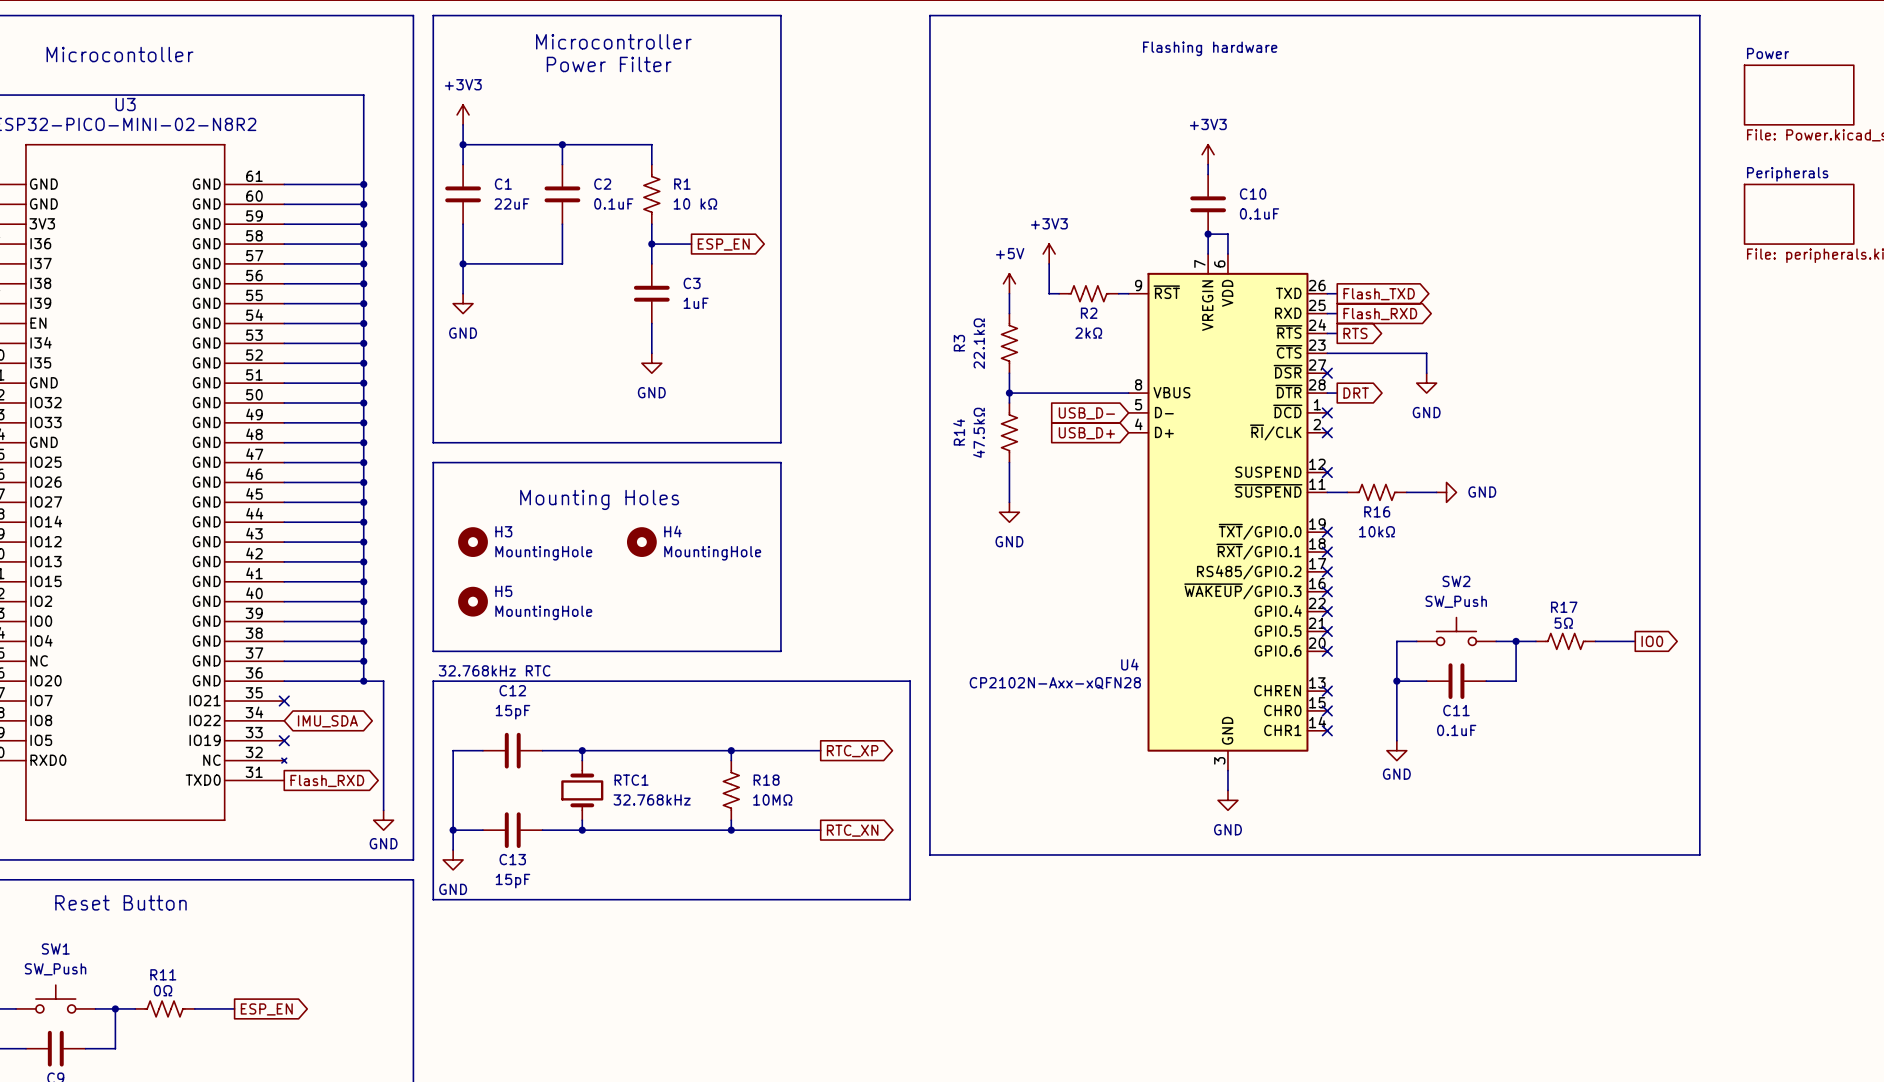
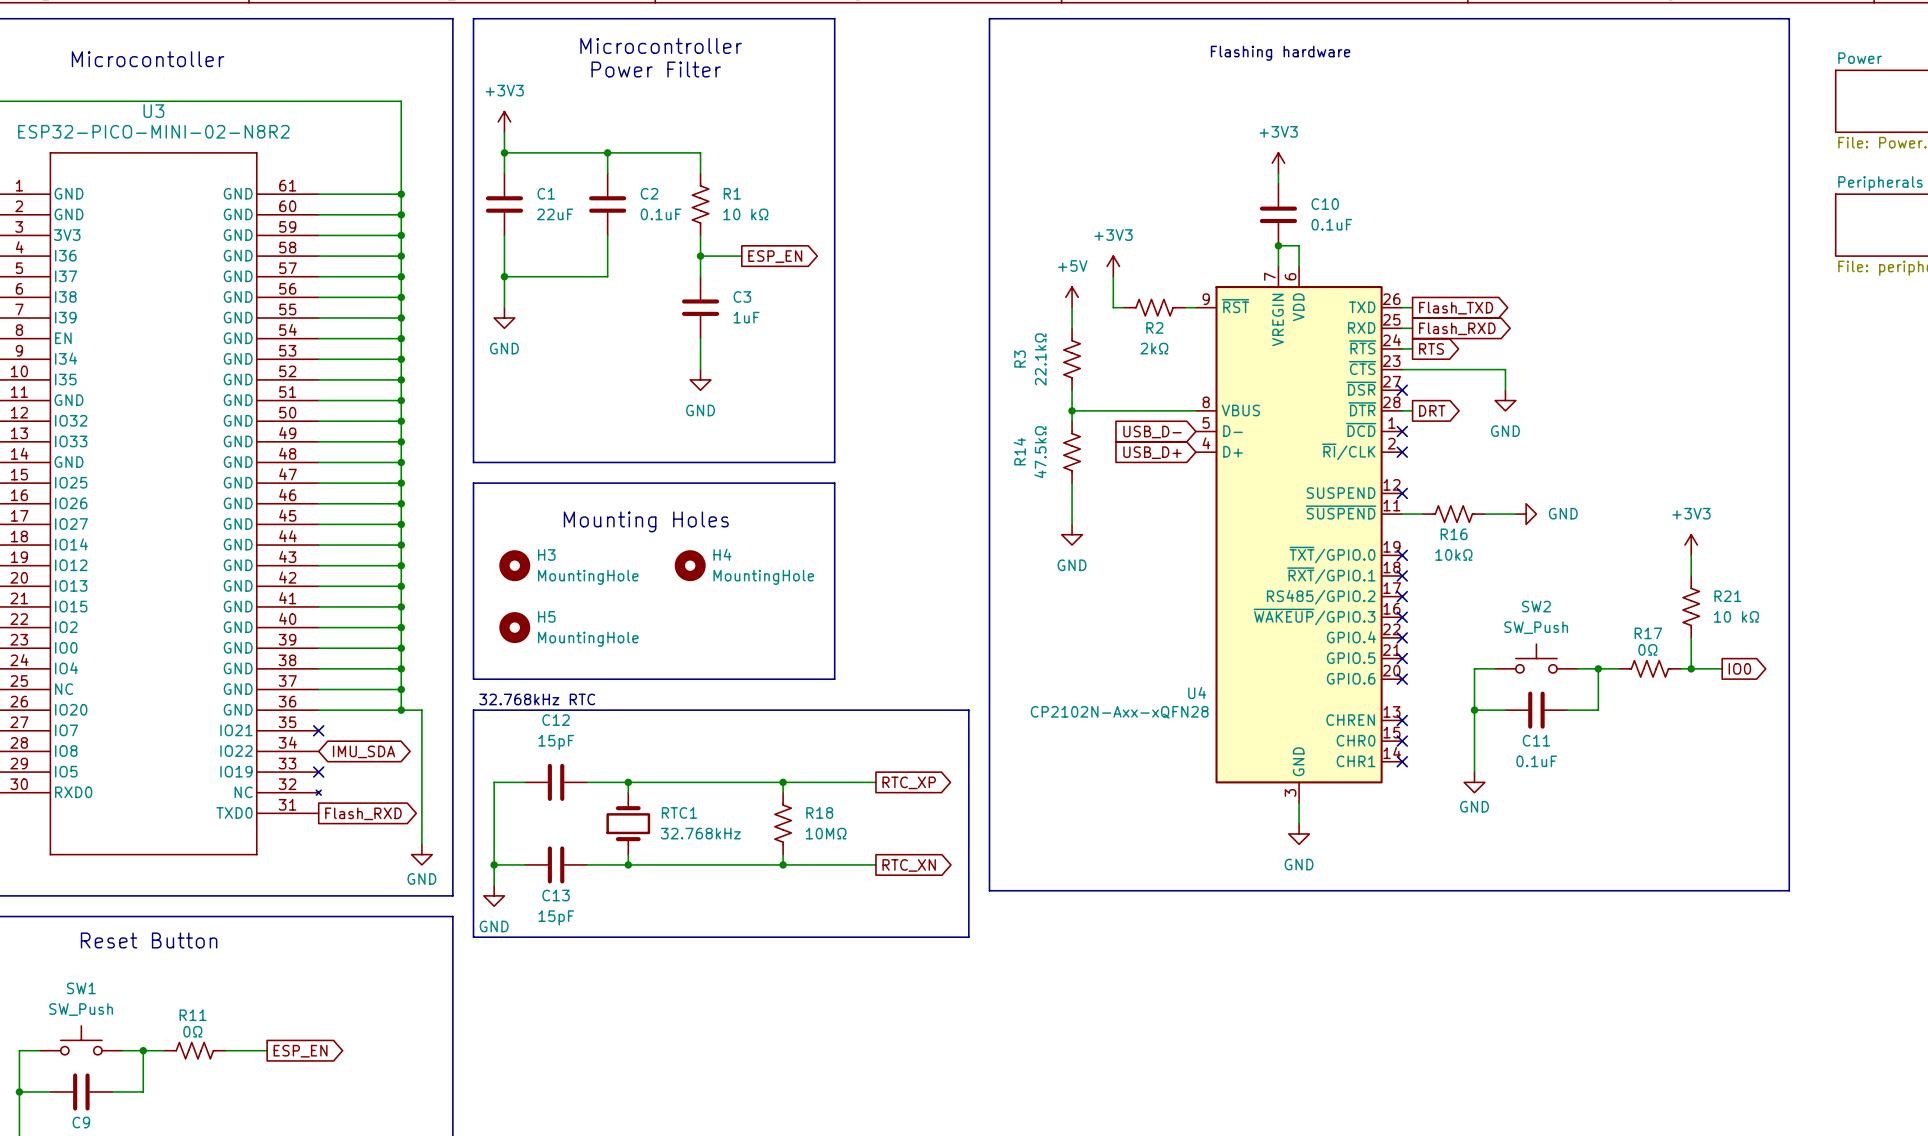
power symbol: none -> +3V3 (1691, 545)
wire: none -> (1691, 555) (1691, 575)
R21: none -> 10 kΩ (1691, 606)
wire: none -> (1691, 637) (1691, 668)
R17 value: 5Ω (1563, 623) -> 0Ω (1647, 649)
junction: none -> (1691, 668)

